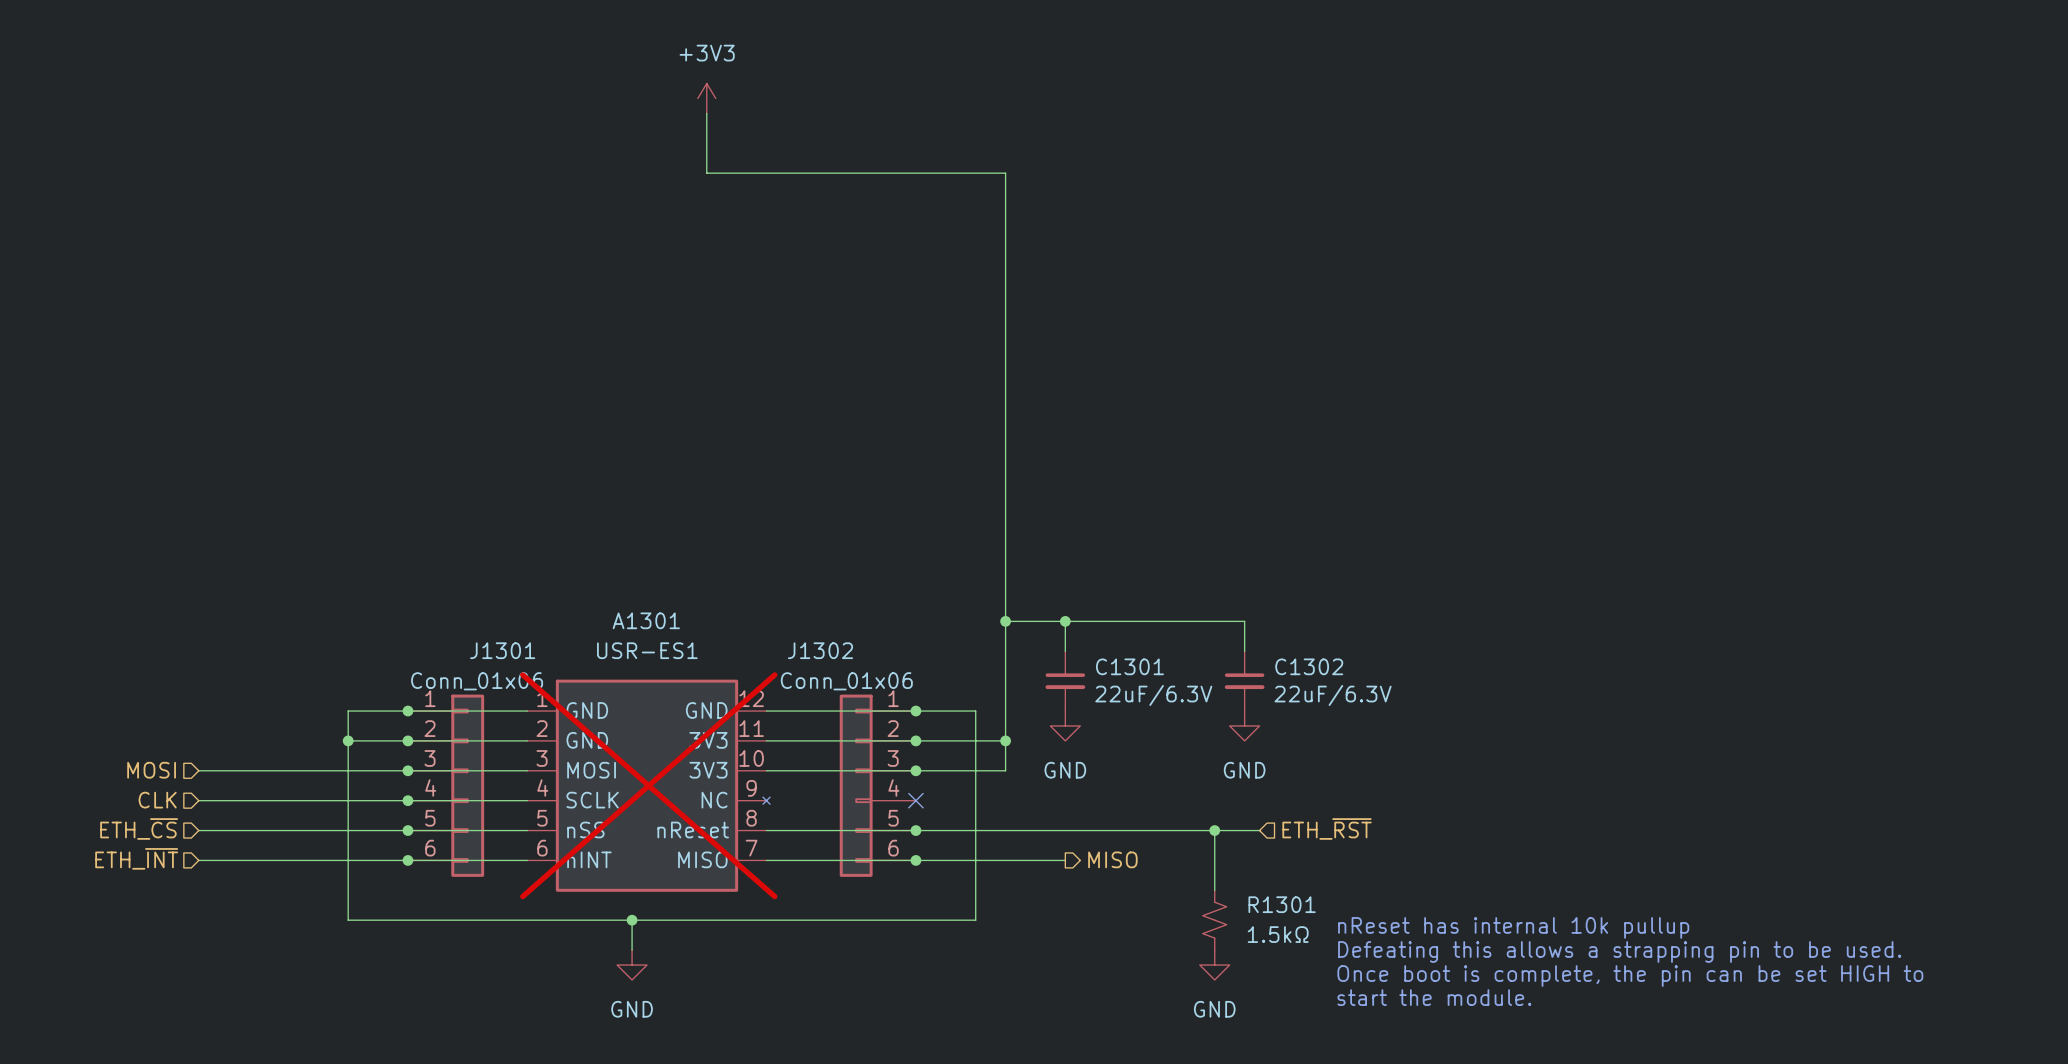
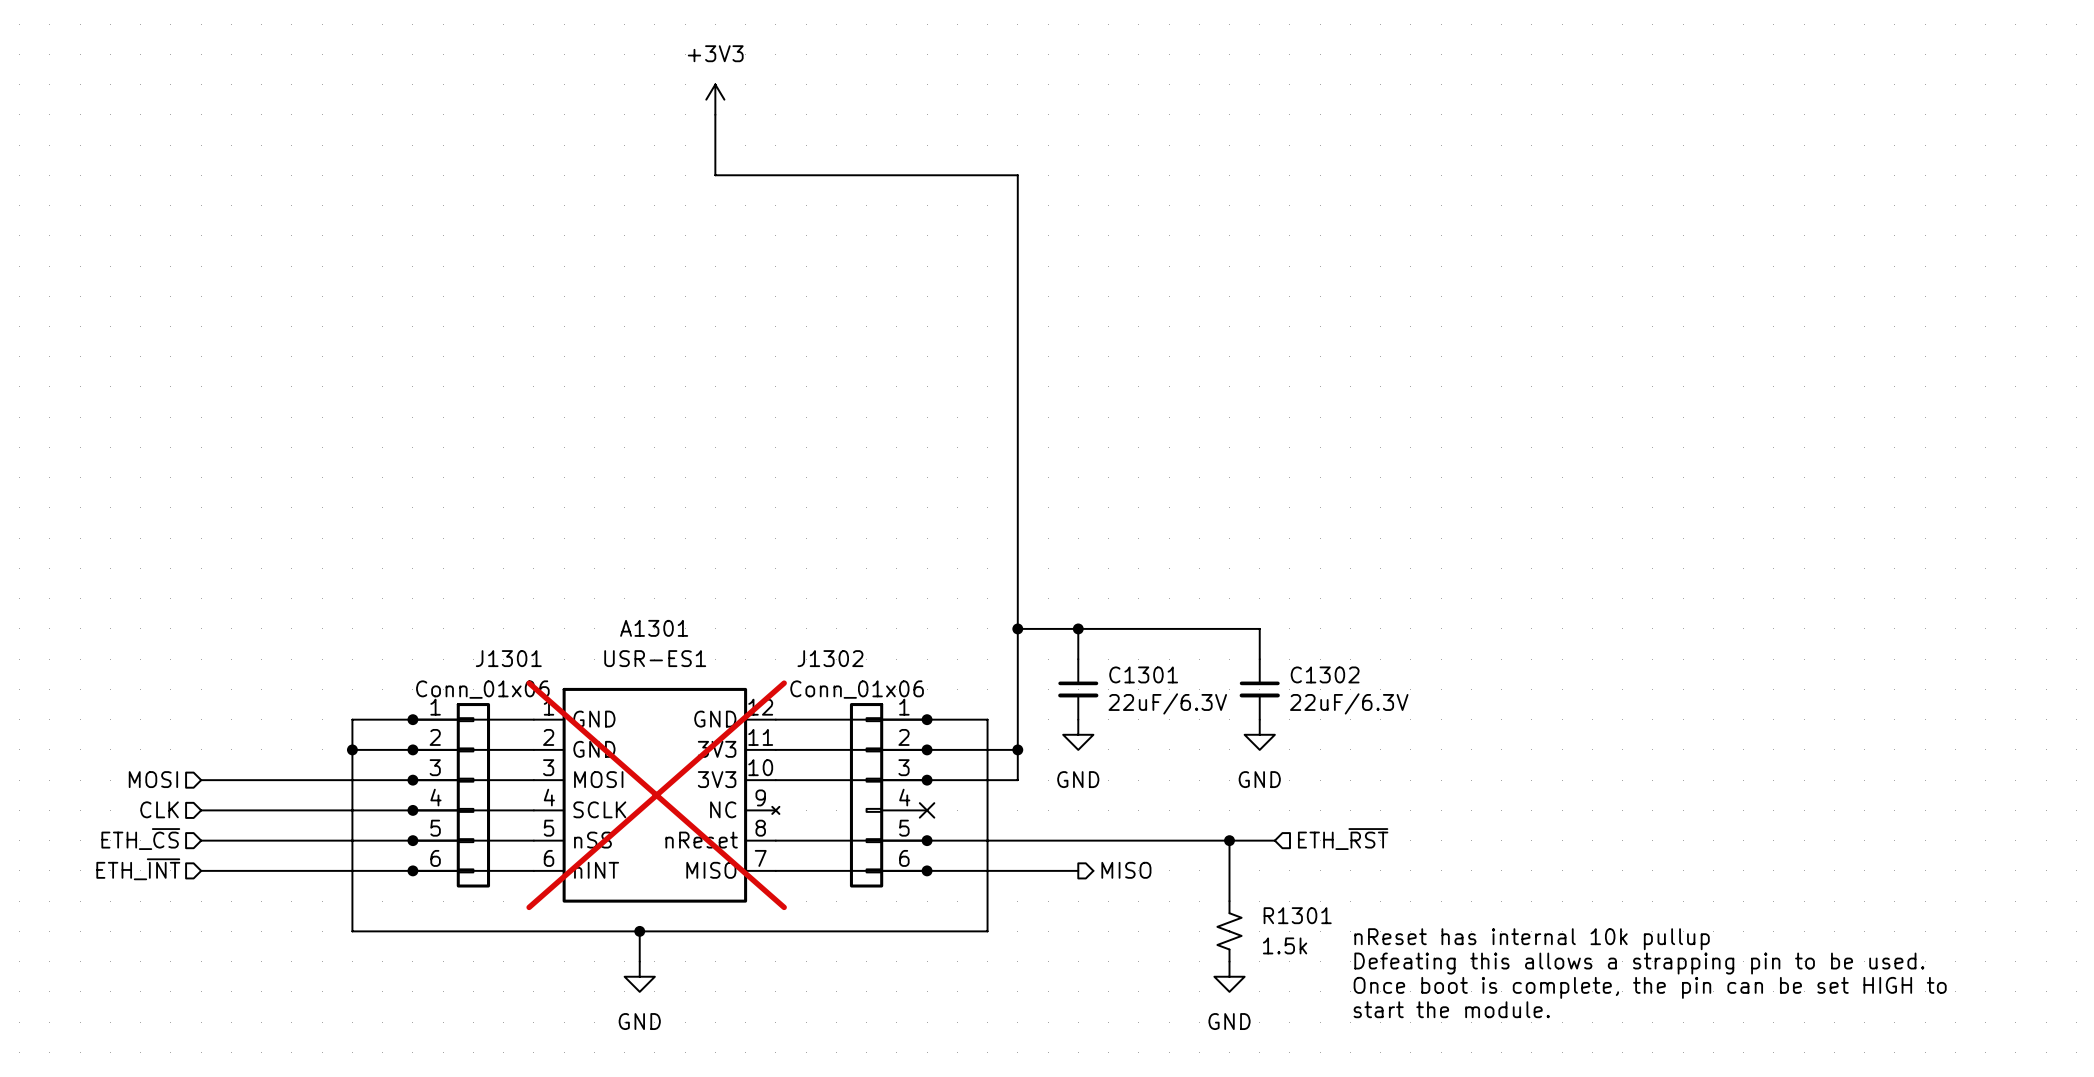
R1301 value: 1.5kΩ (1278, 934) -> 1.5k (1285, 945)

